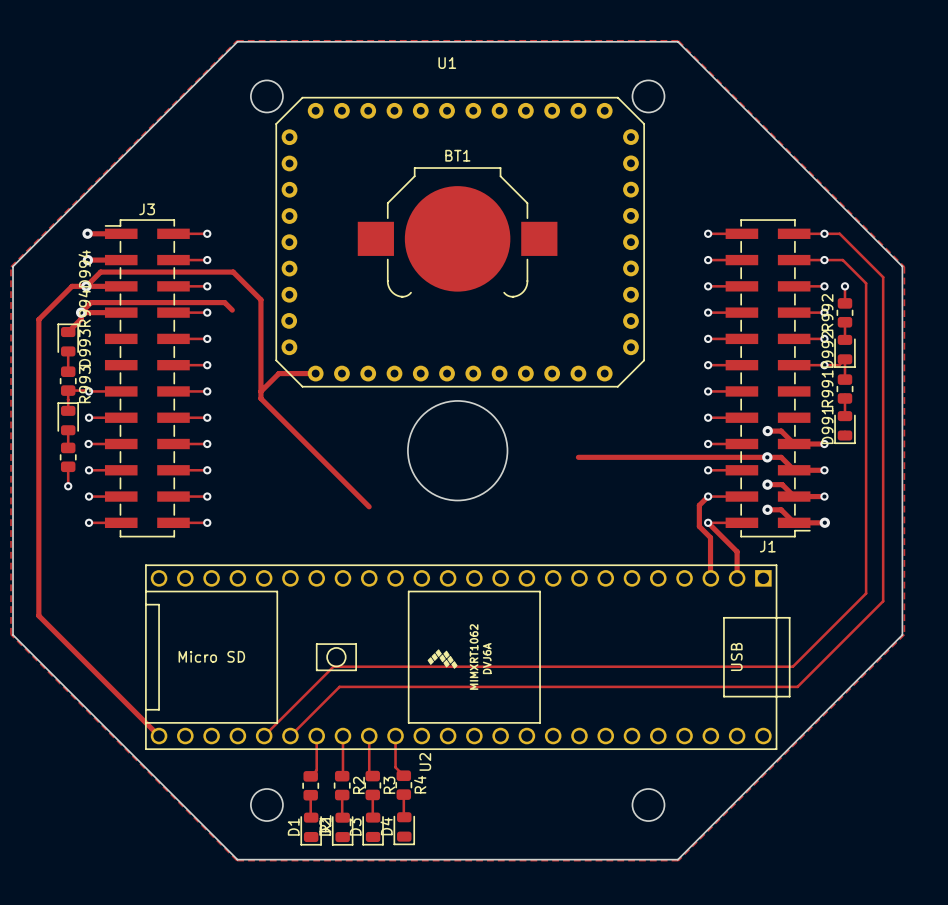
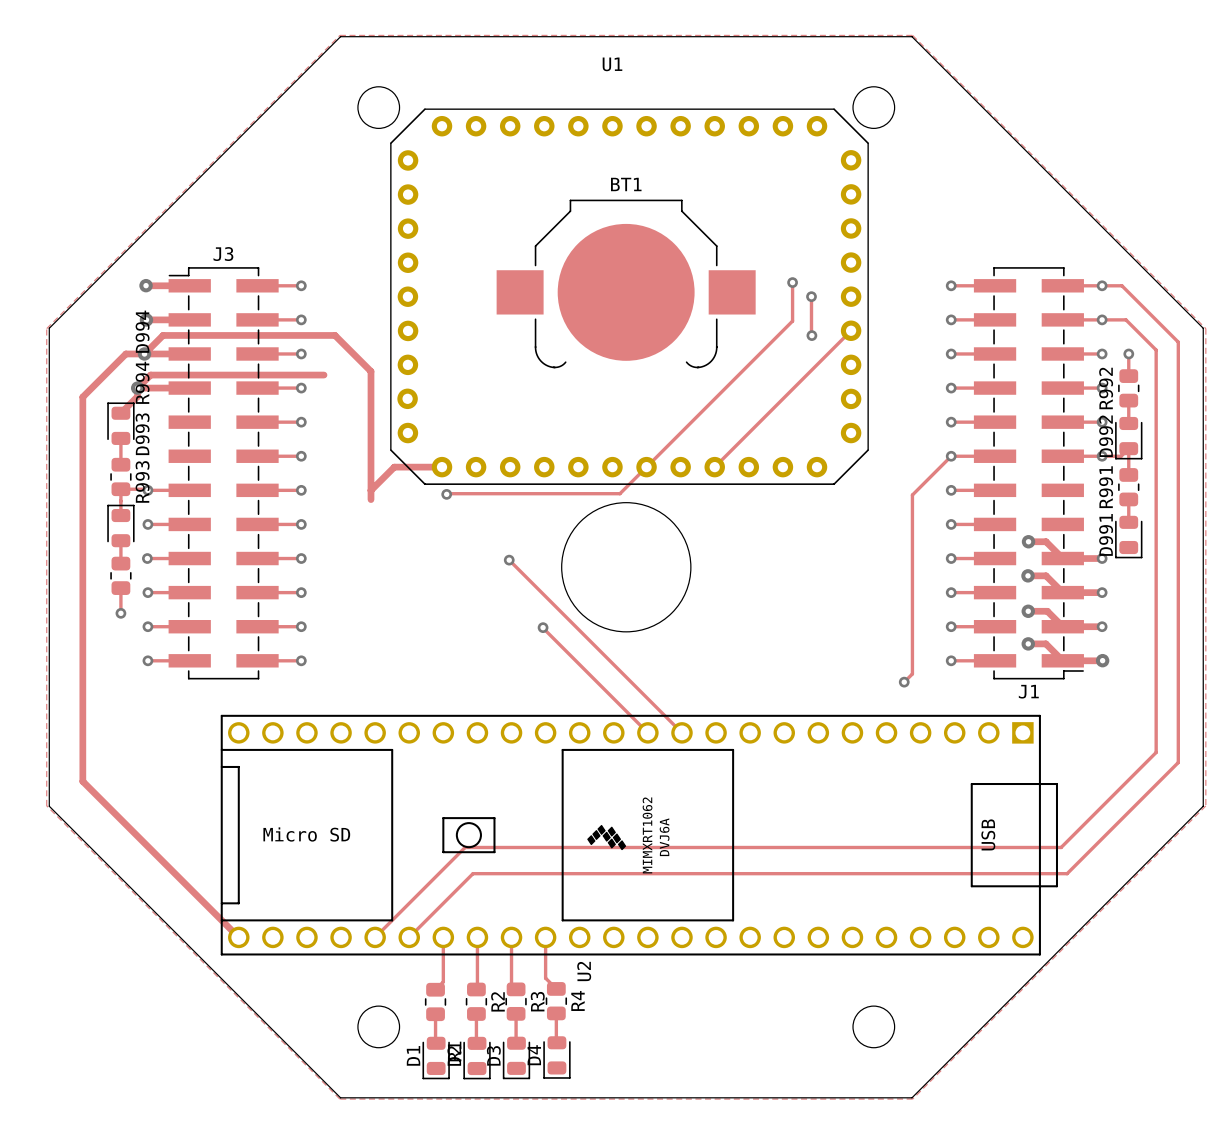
track: none -> (792, 282) (792, 321) (619, 493) (446, 494)
via: none -> (792, 282)
track: none -> (811, 296) (811, 335)
via: none -> (811, 296)
track: none -> (851, 330) (714, 467)
via: none -> (811, 335)
track: (224, 302) (232, 310) -> none
track: none -> (951, 456) (912, 495) (912, 673) (904, 682)
via: none -> (446, 494)
track: (260, 398) (369, 506) -> none
track: none -> (509, 560) (681, 732)
via: none -> (509, 560)
track: (578, 457) (767, 457) -> none
track: (708, 496) (699, 505) (699, 526) (710, 537) (710, 578) -> none
track: none -> (543, 627) (647, 732) (647, 724)
via: none -> (543, 627)
track: (708, 522) (737, 551) (737, 578) -> none
via: none -> (904, 682)

